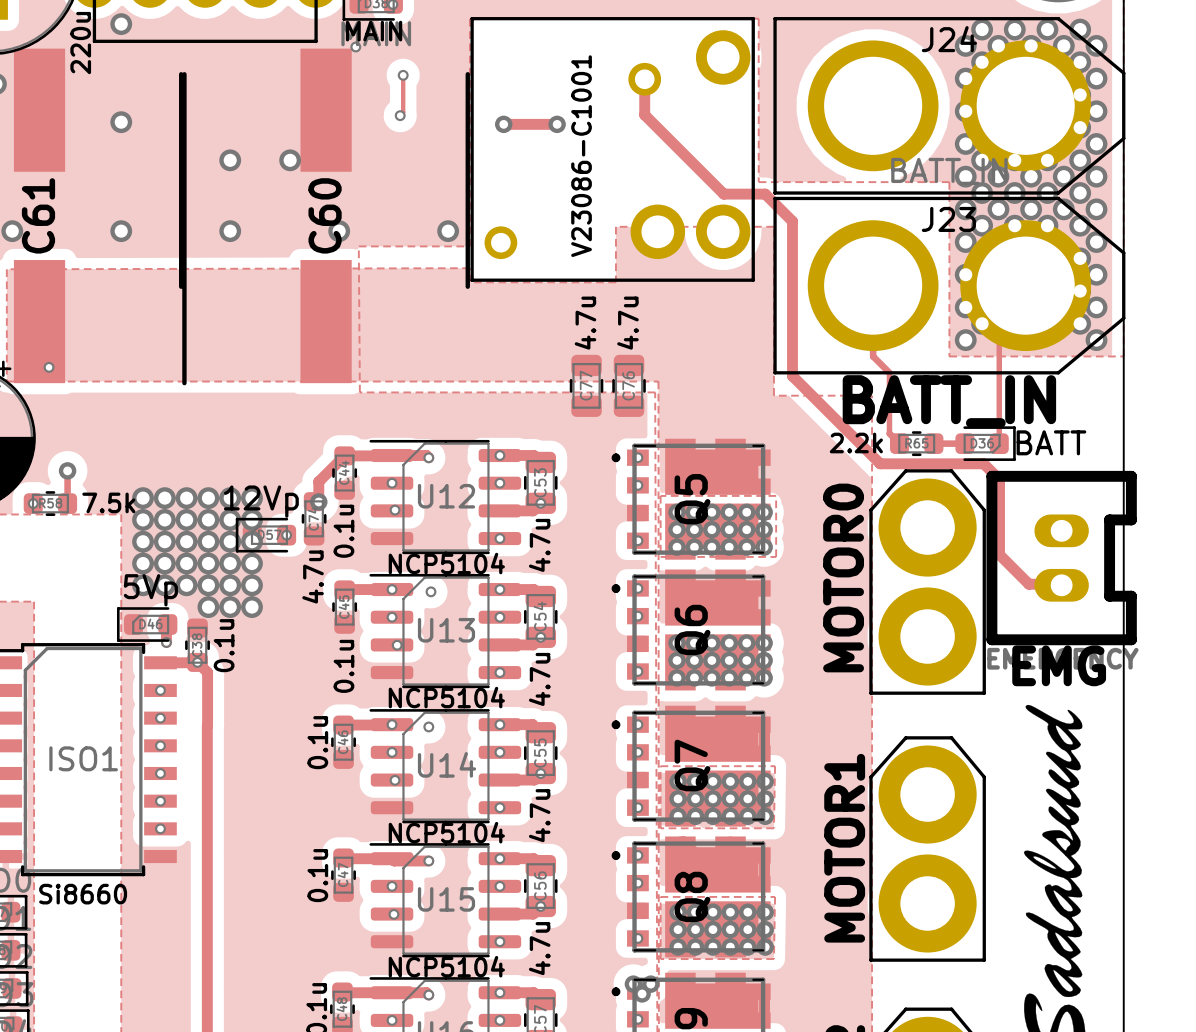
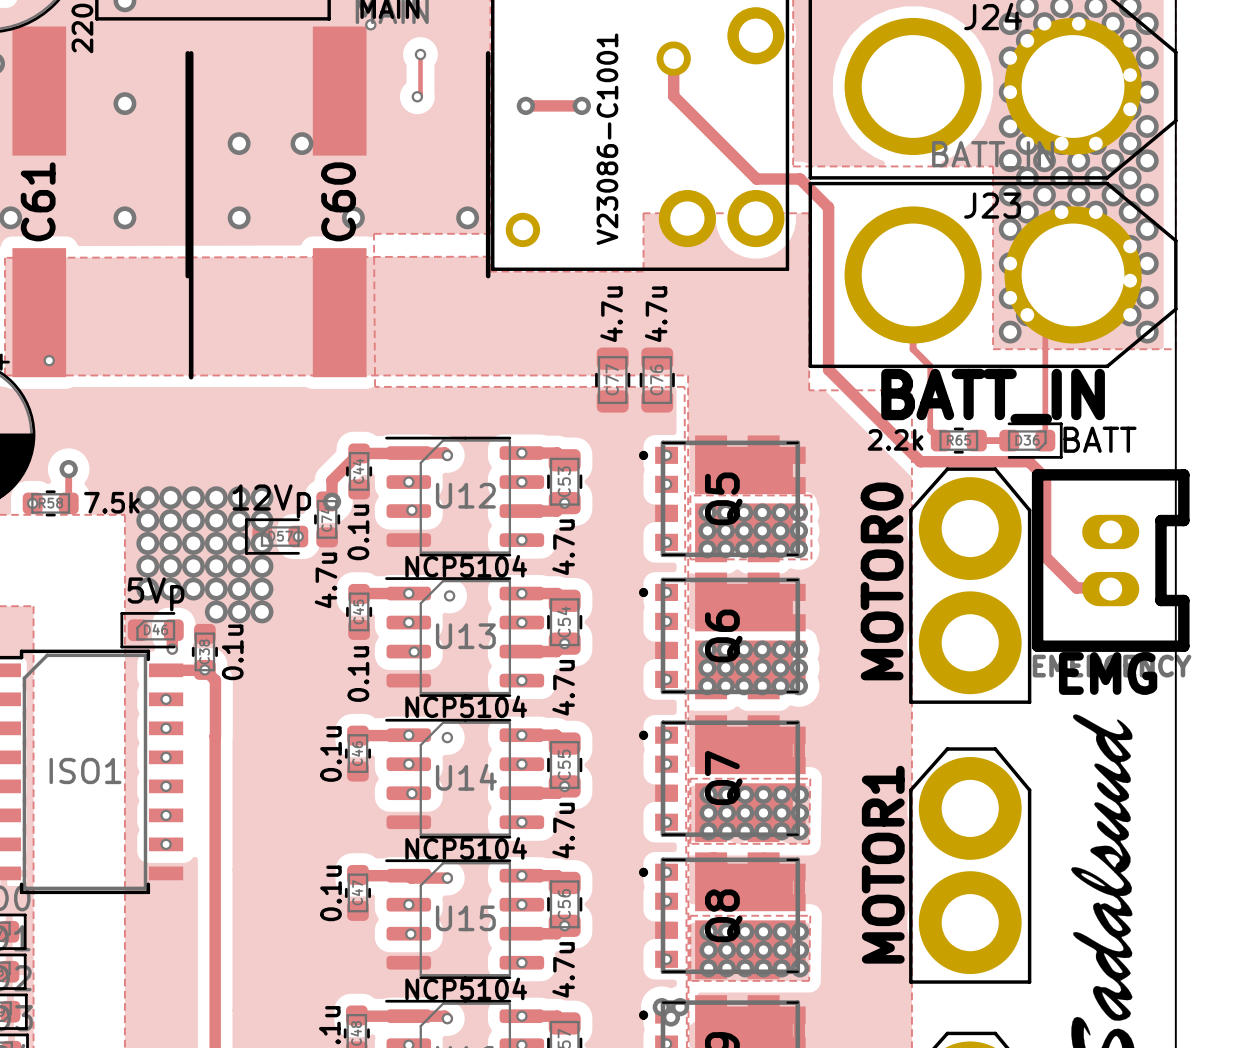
ISO1 value: Si8660 (83, 894) -> none

